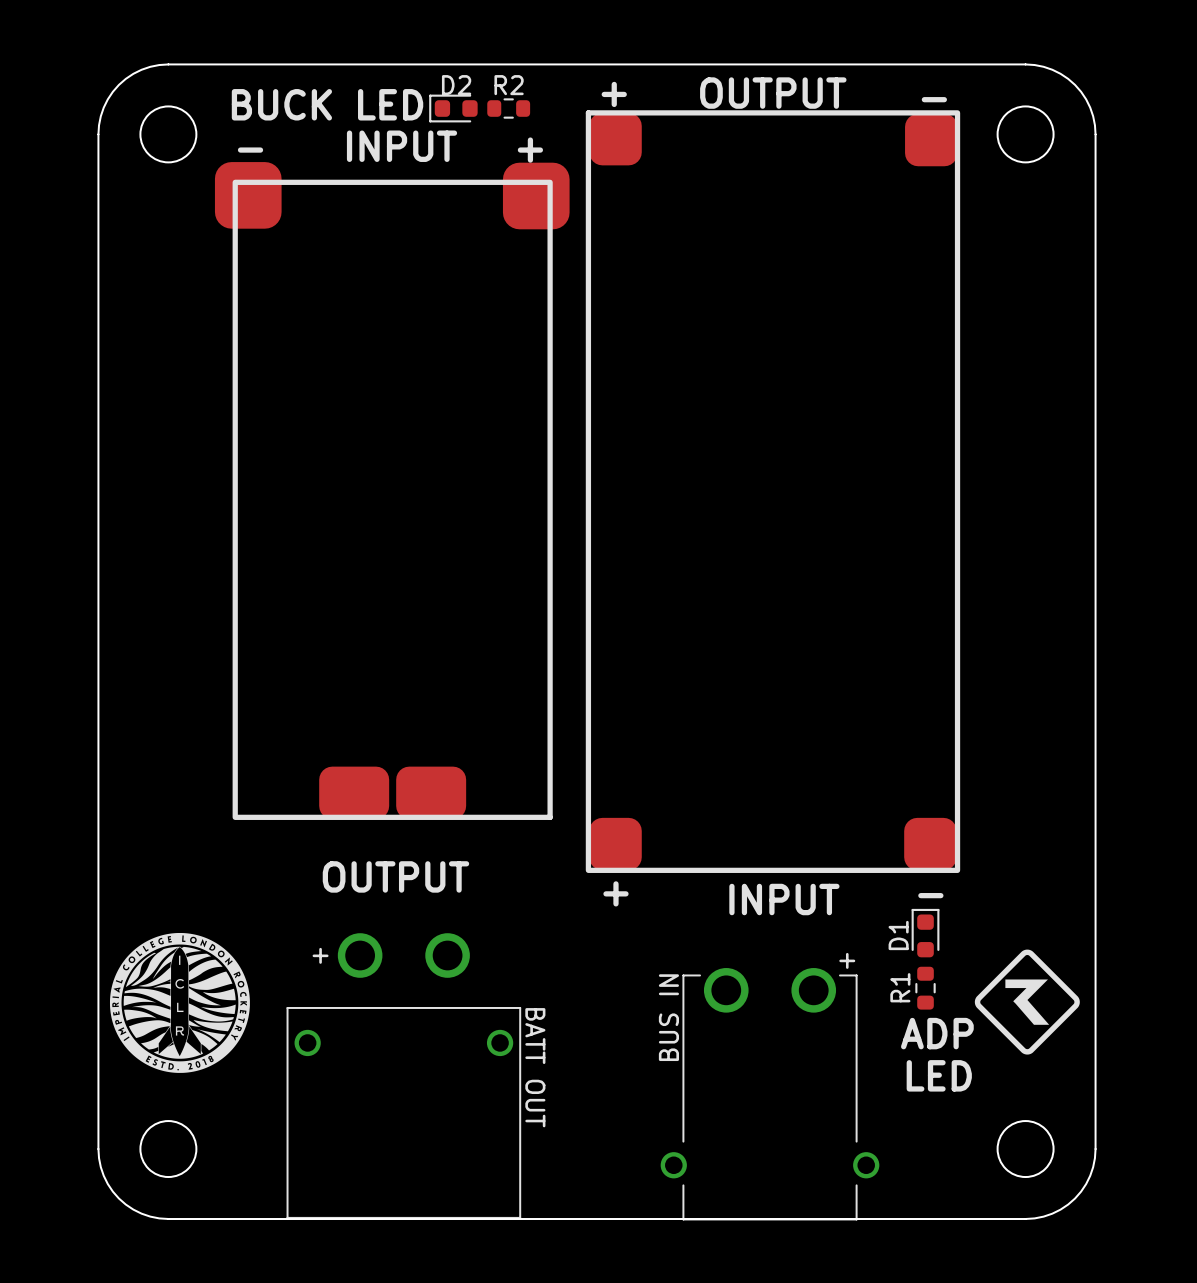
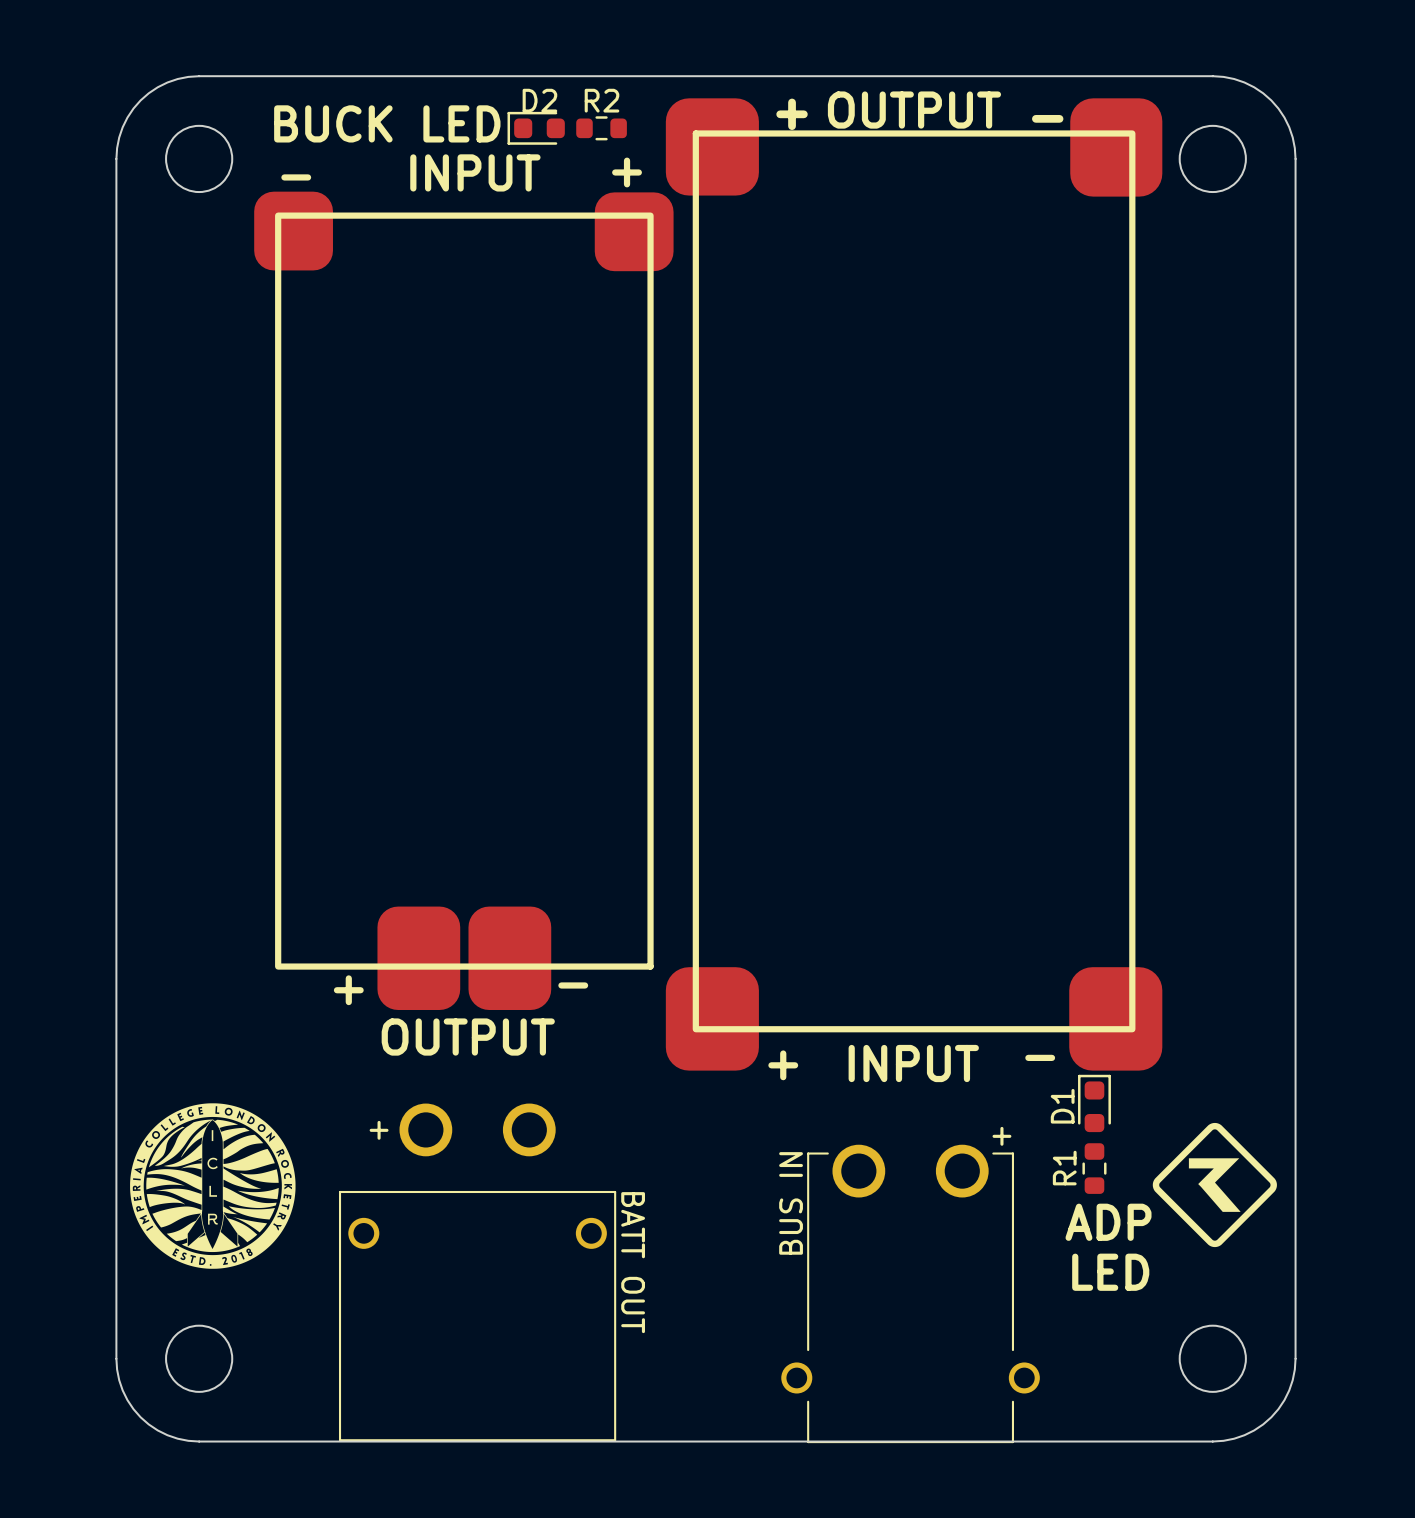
part text: none -> + (792, 114)
part text: none -> - (1047, 118)
part footprint: [585, 110, 961, 873] -> [665, 98, 1163, 1071]
part footprint: [214, 162, 570, 820] -> [254, 191, 674, 1011]

